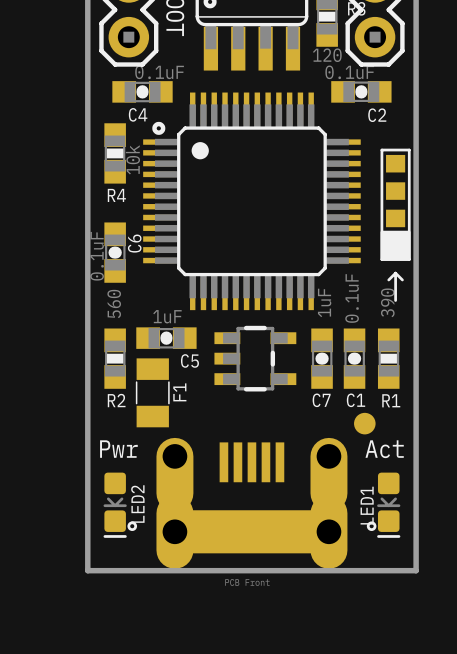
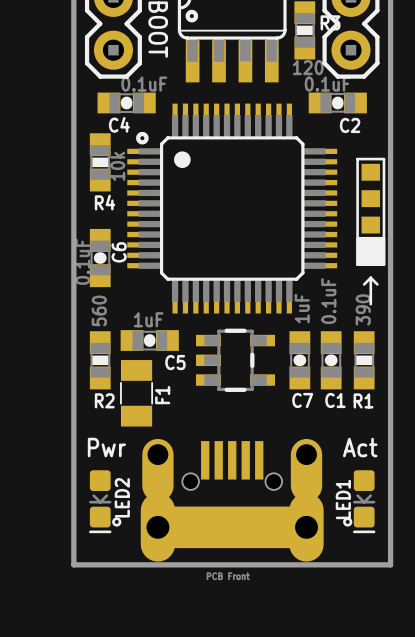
part: (364, 423) -> none
part footprint: [156, 437, 348, 569] -> [140, 438, 324, 562]

